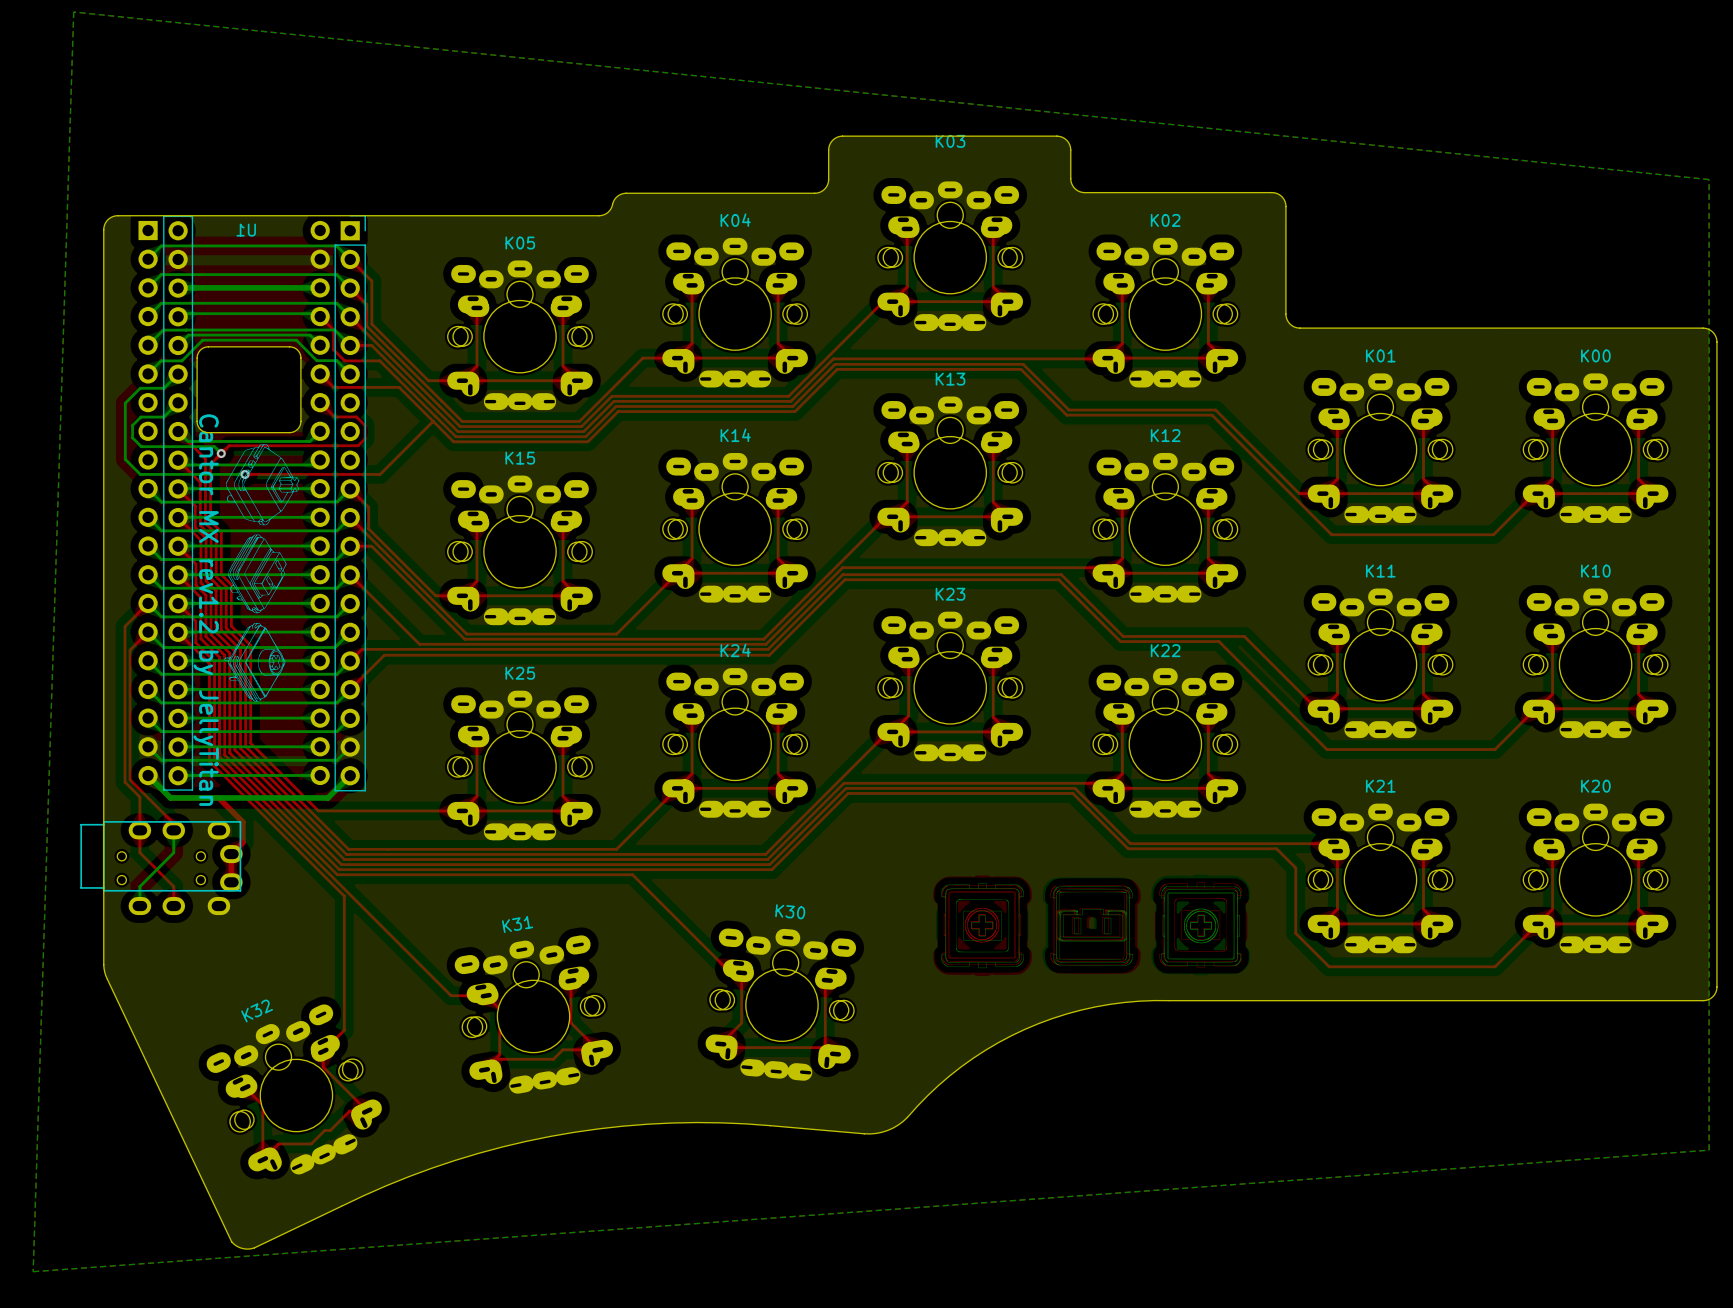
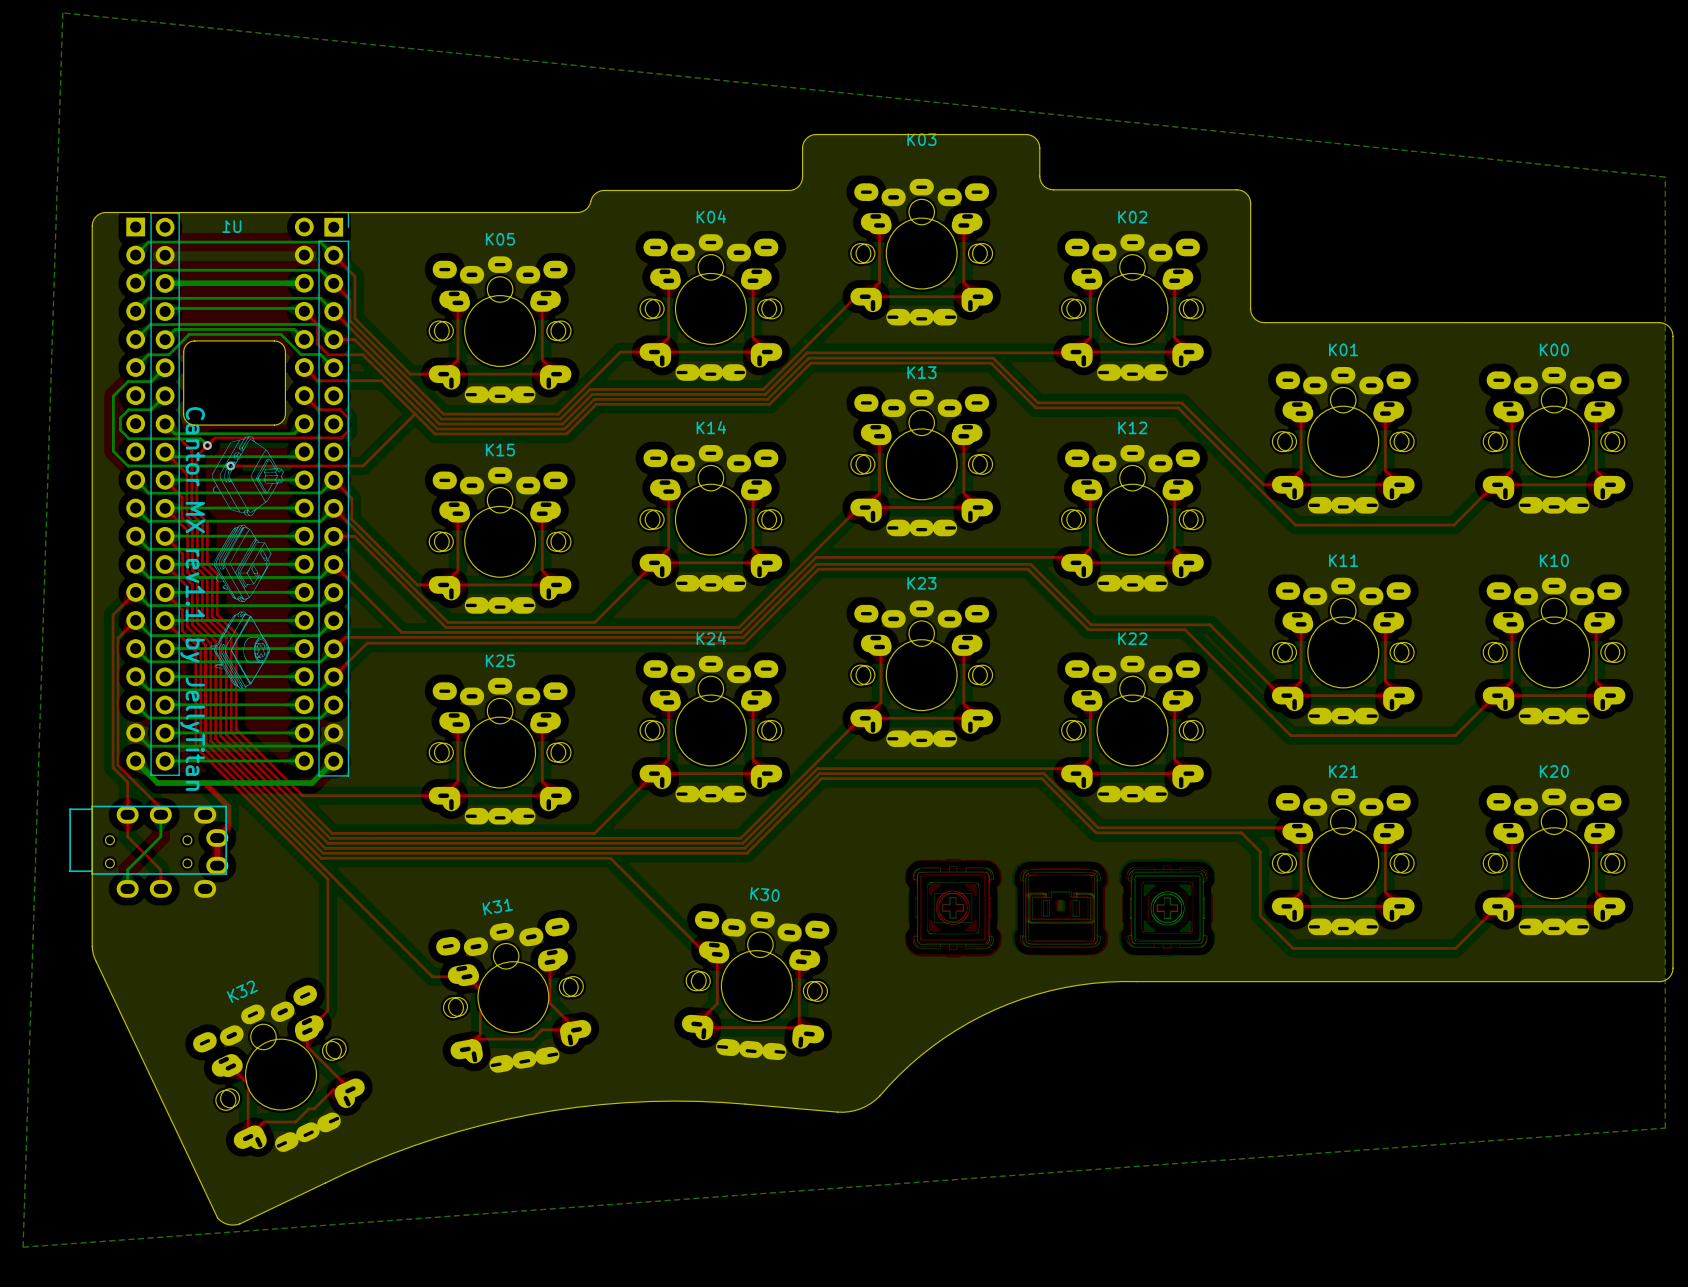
text: Cantor MX rev1.2 by JellyTitan (206, 610) -> Cantor MX rev1.1 by JellyTitan (192, 598)

